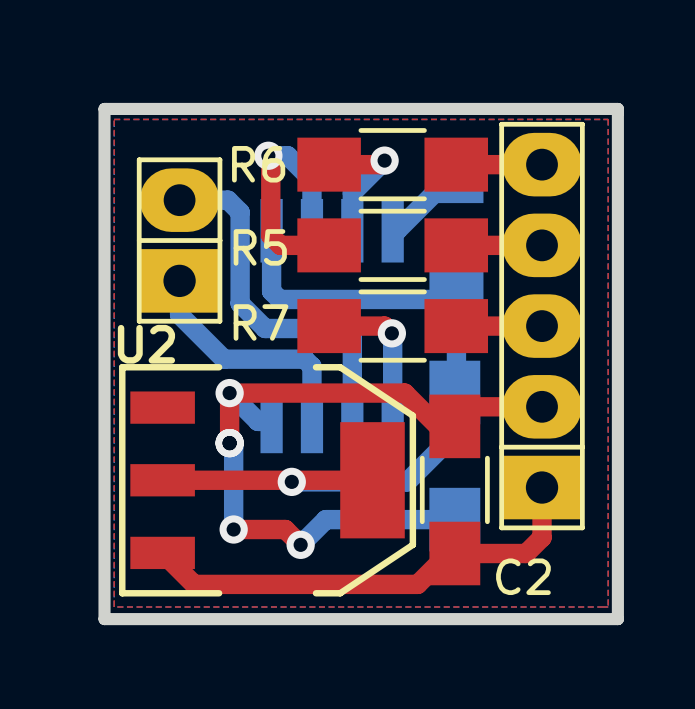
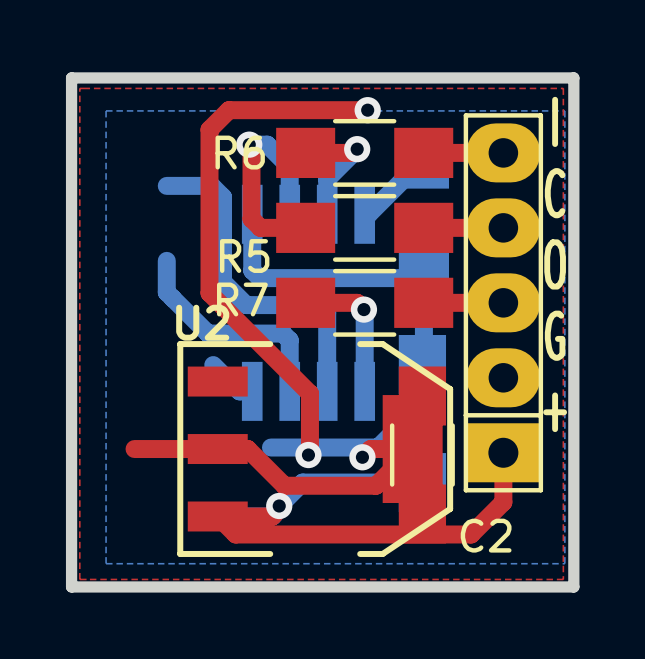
board edge: (617, 108) (104, 108) (104, 619) (106, 619) -> (573, 101) (573, 77) (71, 77) (71, 586) (573, 586) (573, 574)
top track: none -> (367, 110) (229, 110) (209, 129) (209, 293) (309, 393) (308, 455)
via: none -> (367, 110)
top zone outline: (114, 119) (114, 606) (608, 606) (608, 119) (114, 119) -> (79, 88) (79, 579) (563, 579) (563, 88) (79, 88)
text: none -> I (555, 121)
text: none -> C (555, 193)
part: (179, 240) -> none
R5 name position: R5 (260, 247) -> R5 (244, 256)
text: none -> O (555, 264)
text: none -> G (555, 335)
via: (229, 393) -> none
top track: (542, 406) (474, 406) (454, 426) (438, 426) (404, 393) (229, 393) (229, 443) -> none
bottom track: (229, 443) (233, 447) (233, 529) -> none
via: (229, 443) -> none
text: none -> + (555, 412)
top track: (162, 480) (372, 480) -> none
U2 position: (267, 480) -> (315, 449)
via position: (291, 481) -> (308, 455)
top track: none -> (134, 449) (247, 449) (284, 485) (375, 485) (412, 449) (370, 449) (362, 457)
via: none -> (362, 457)
top track: (233, 529) (285, 529) (300, 544) -> none
via: (233, 529) -> none
top track: (542, 537) (526, 553) (448, 553) (417, 584) (194, 584) (162, 552) -> (503, 499) (503, 502) (471, 534) (235, 534) (217, 516) (272, 516) (274, 514)
board edge: (107, 619) (617, 619) -> none

